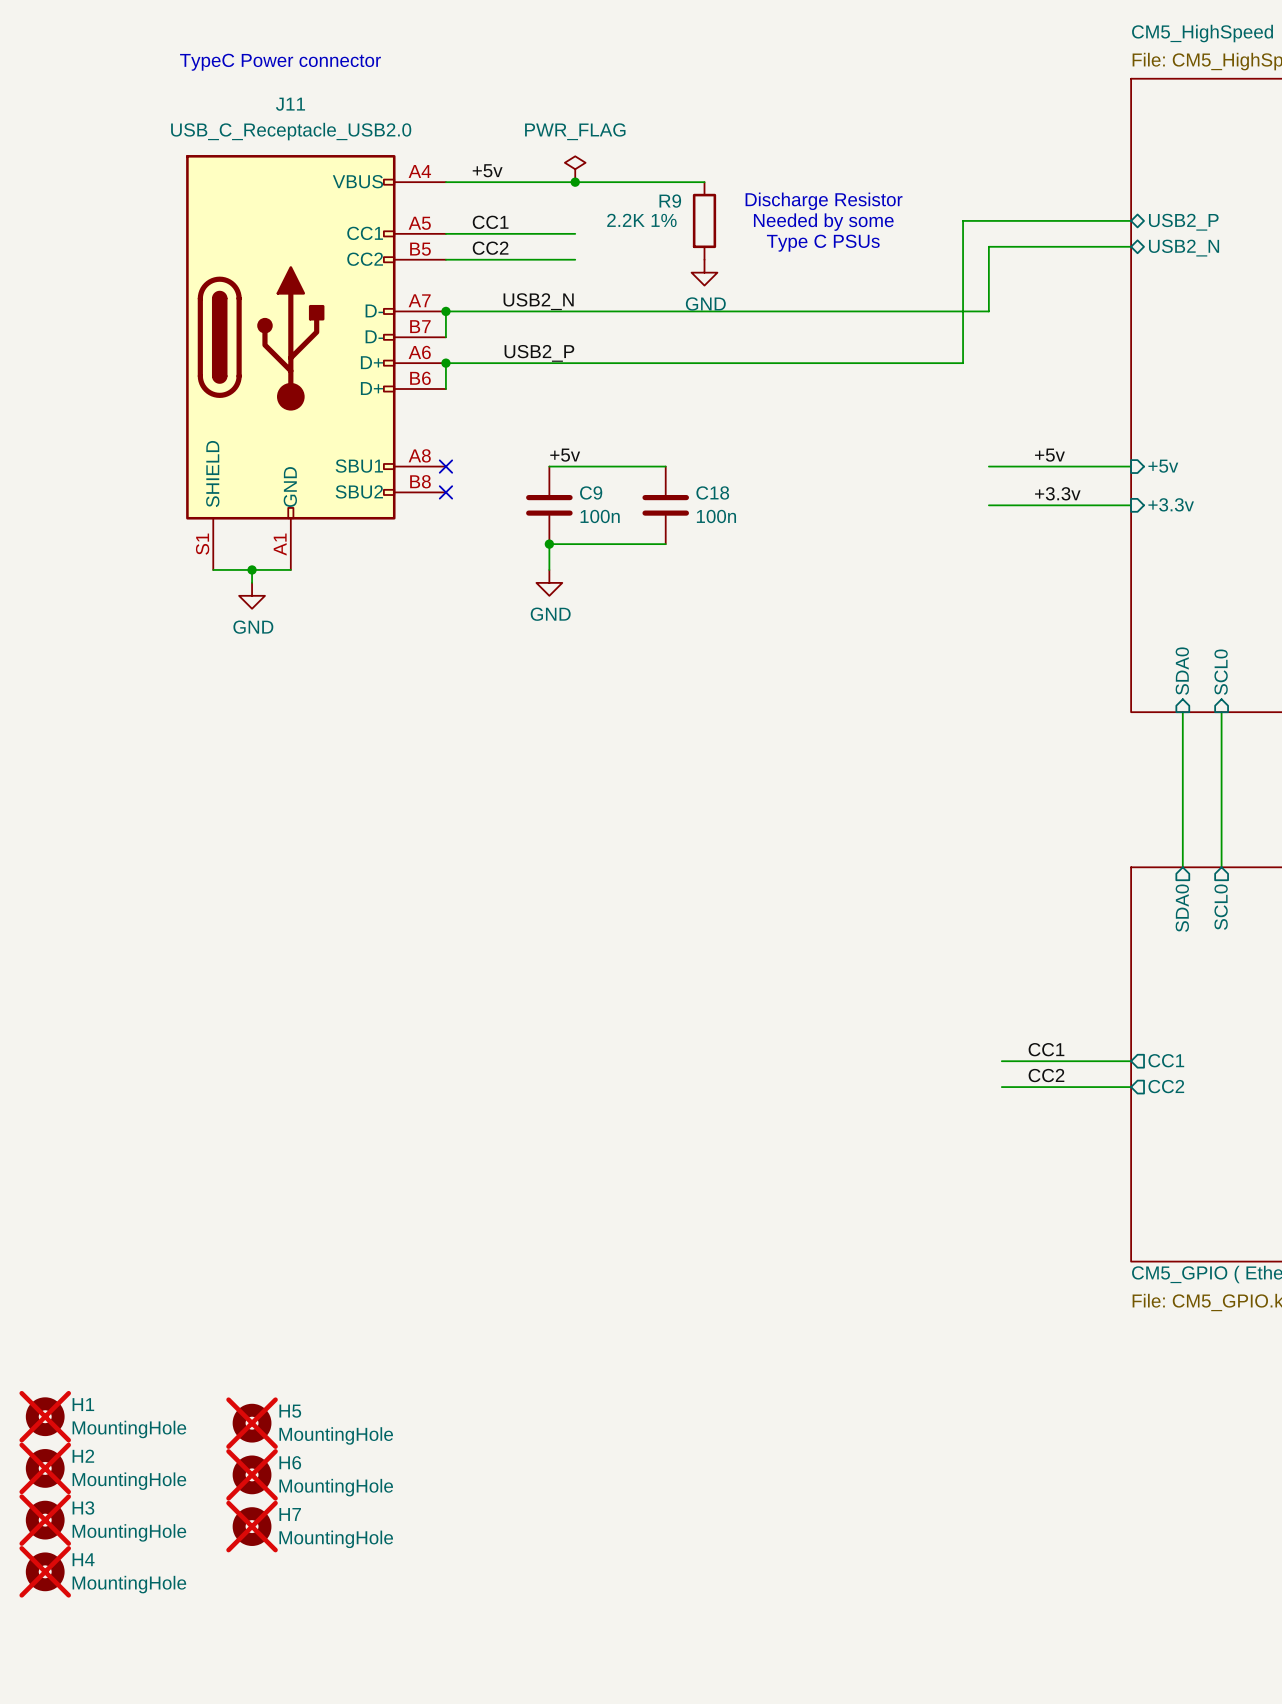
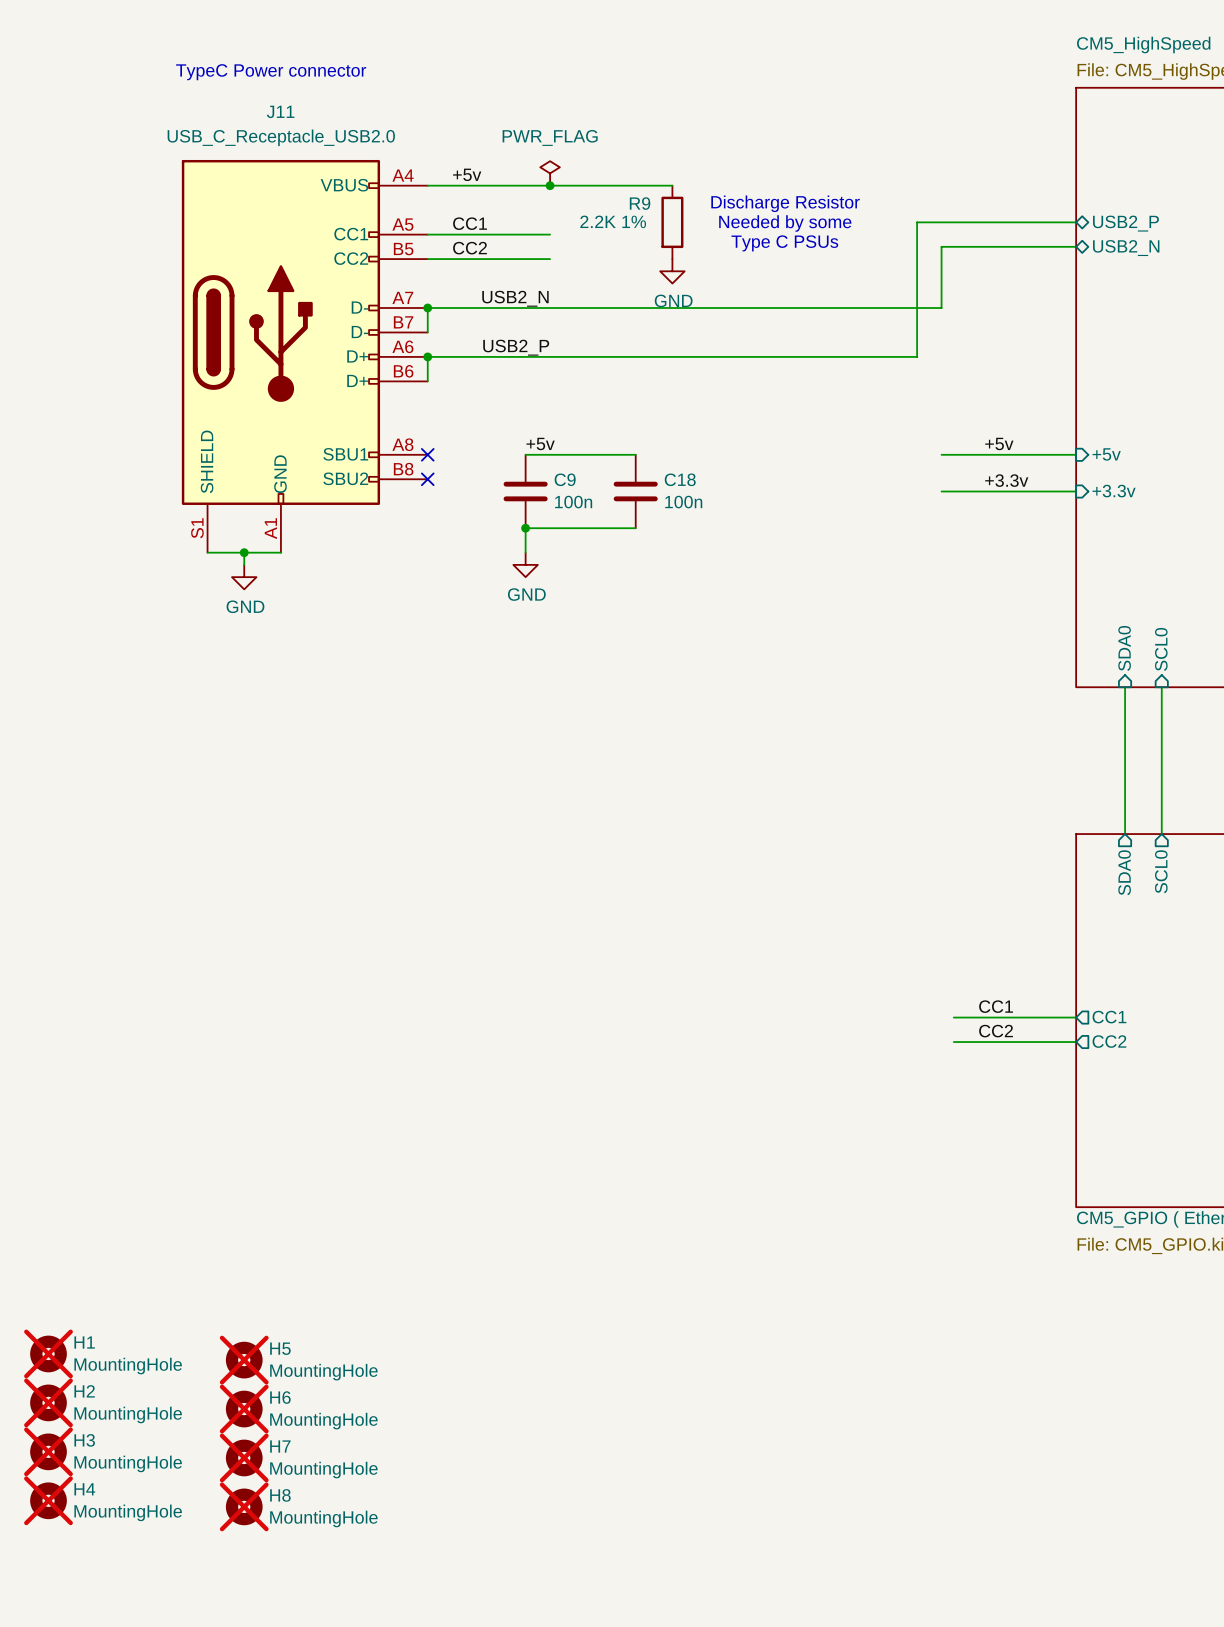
H8: none -> MountingHole (244, 1506)

